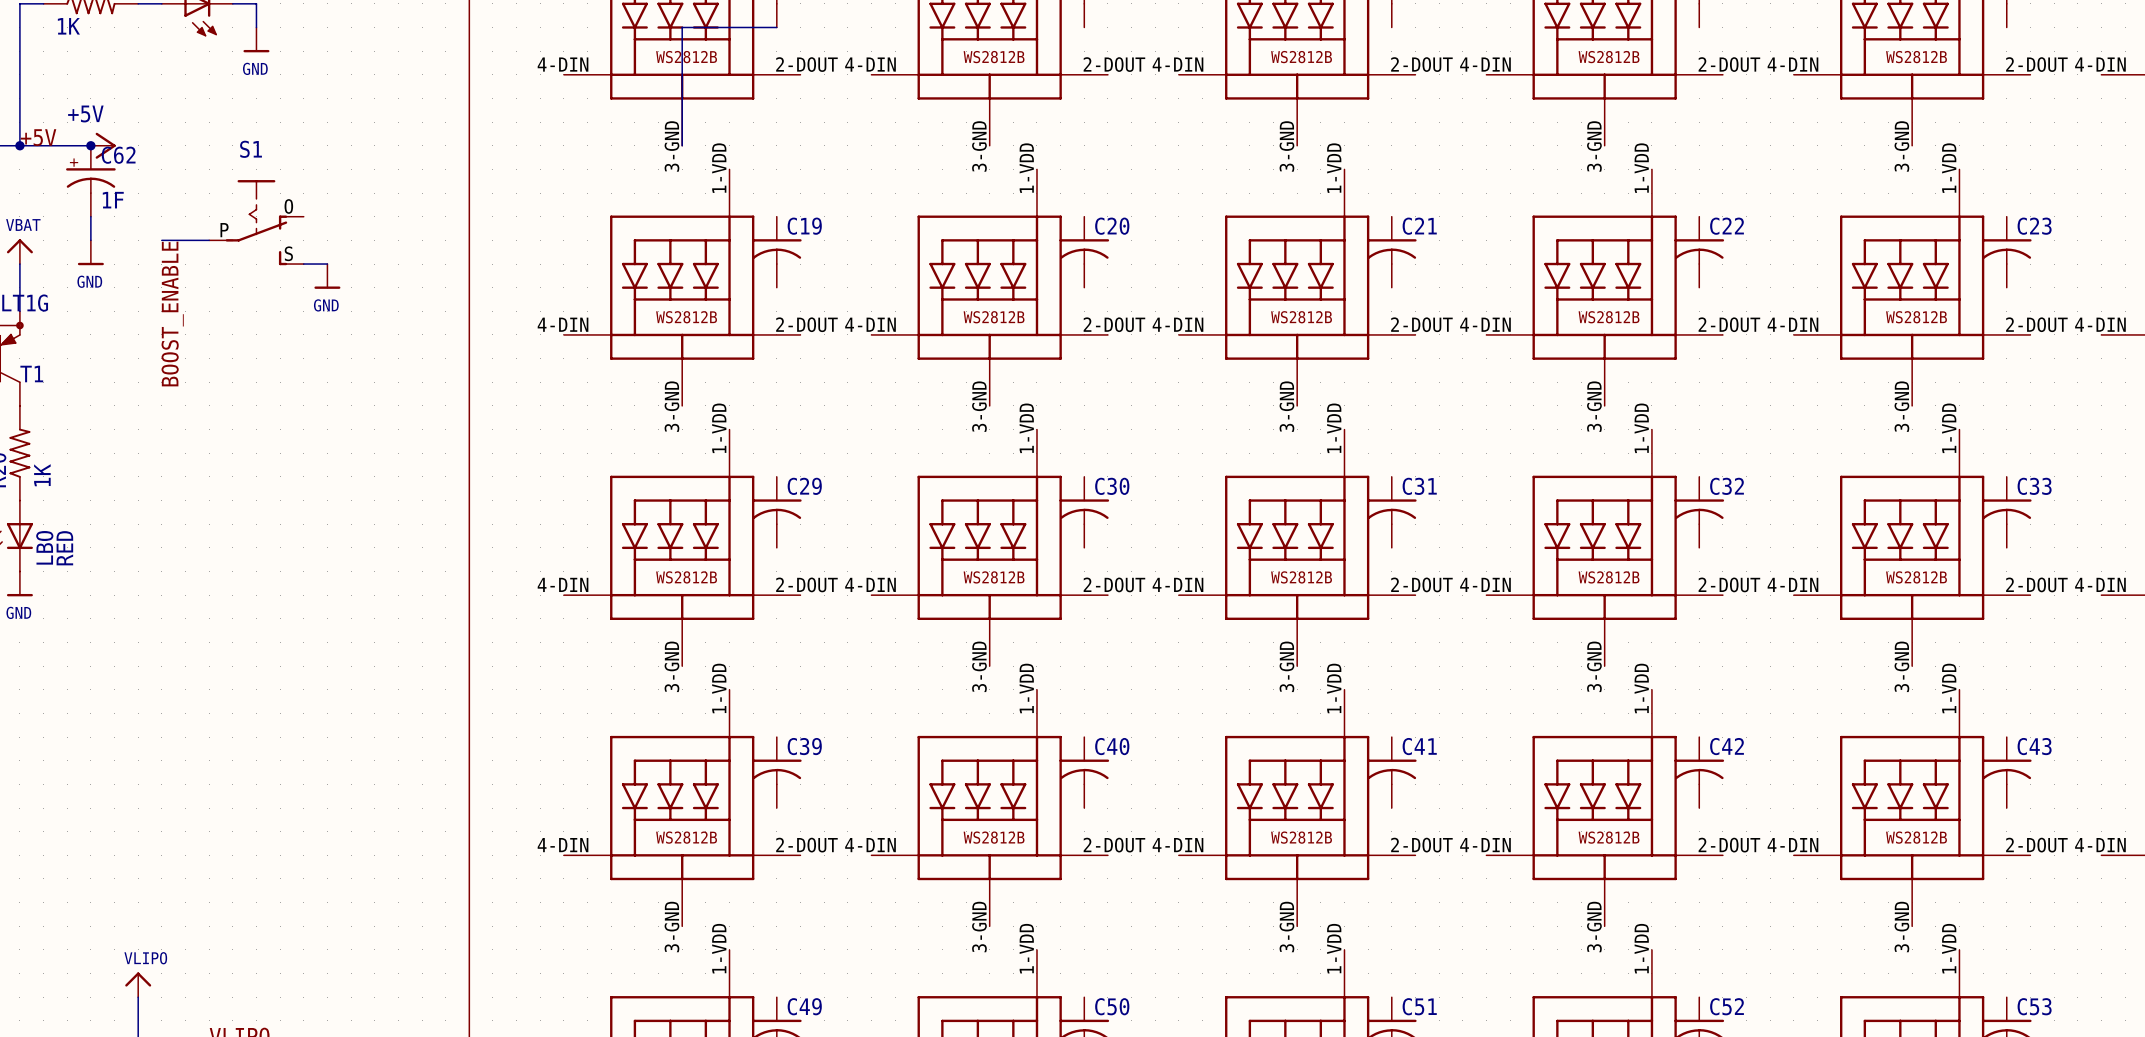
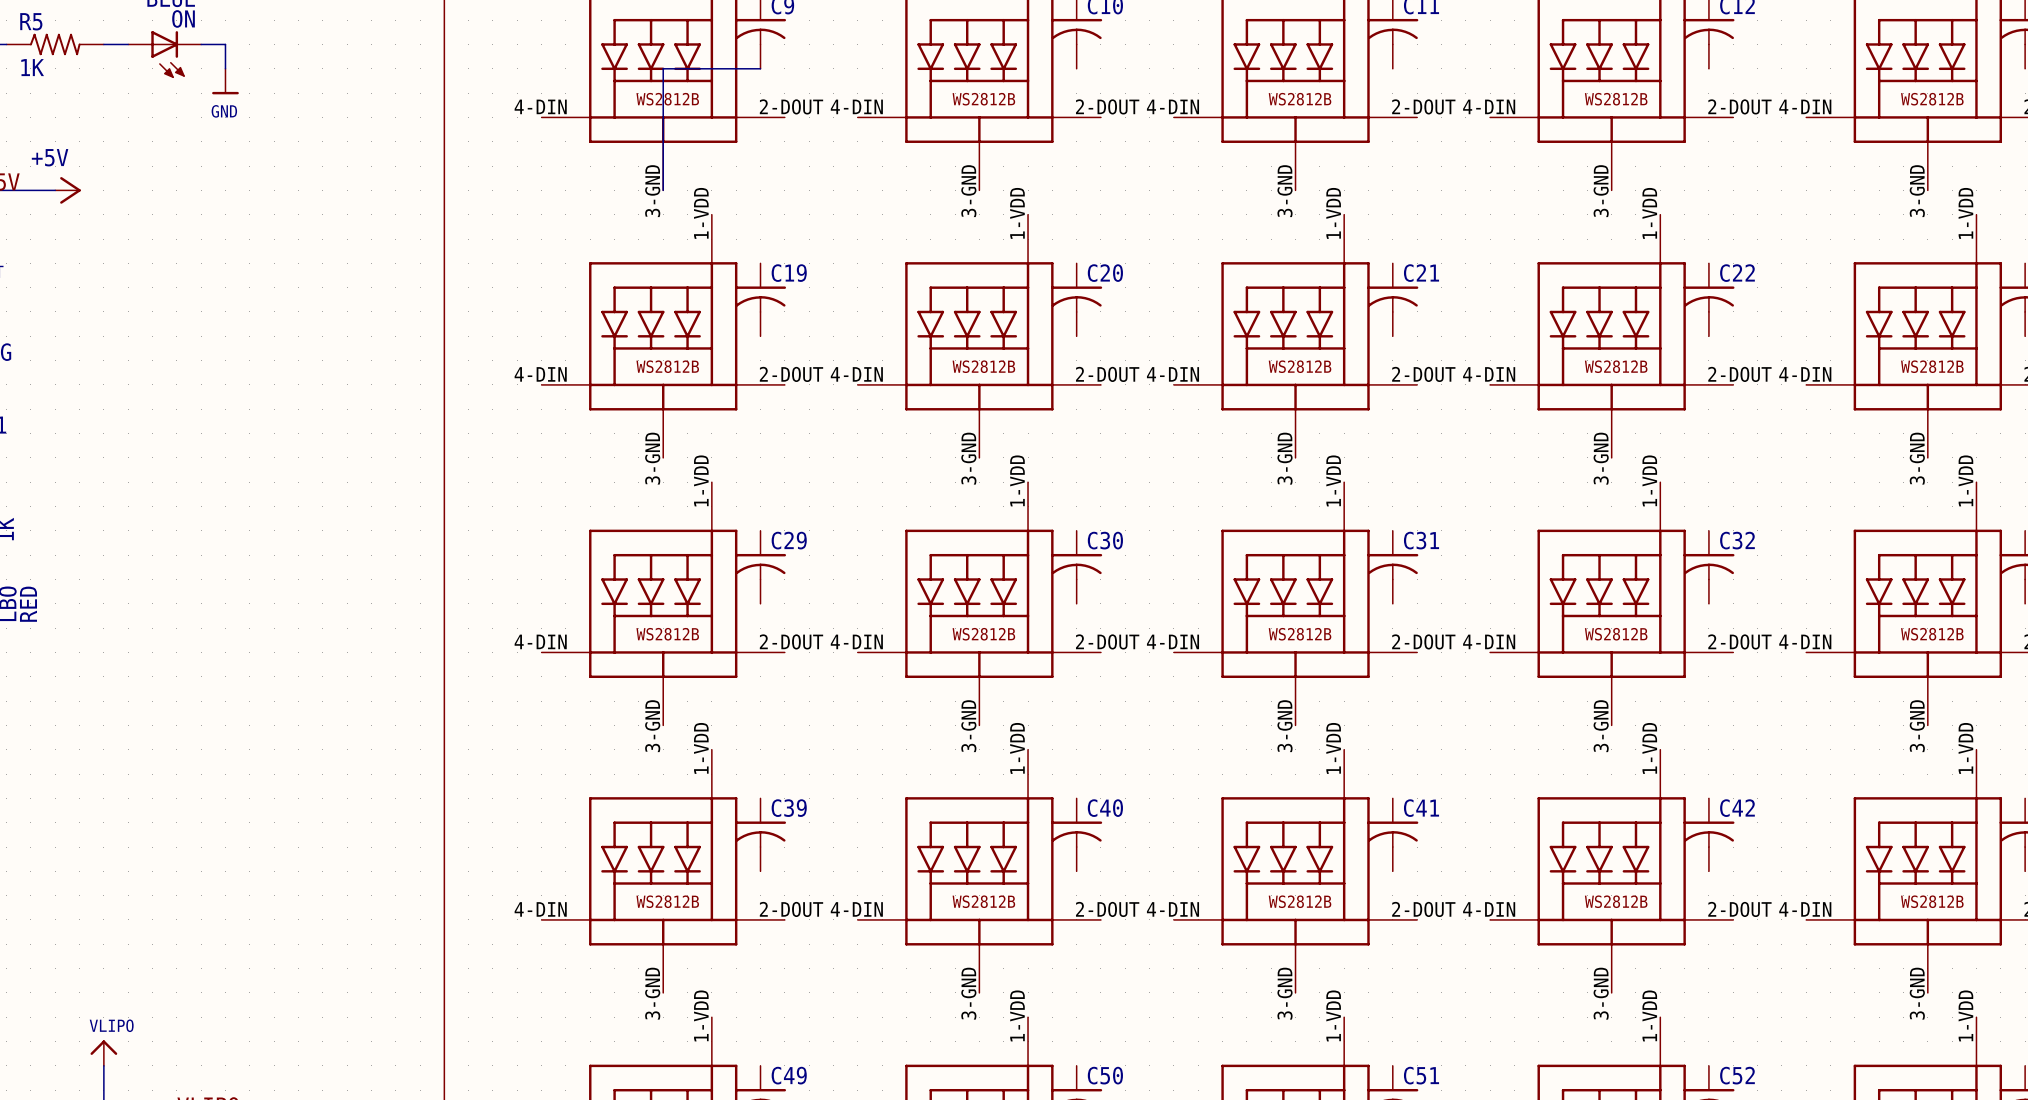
junction: (90, 145) -> none
C62: 1F (90, 181) -> none
wire: (90, 216) (90, 240) -> none
S1: (256, 222) -> none
wire: (161, 240) (209, 240) -> none
power symbol: GND (90, 252) -> none
wire: (303, 264) (327, 264) -> none
power symbol: GND (327, 276) -> none
label: BOOST_ENABLE (172, 314) -> none

